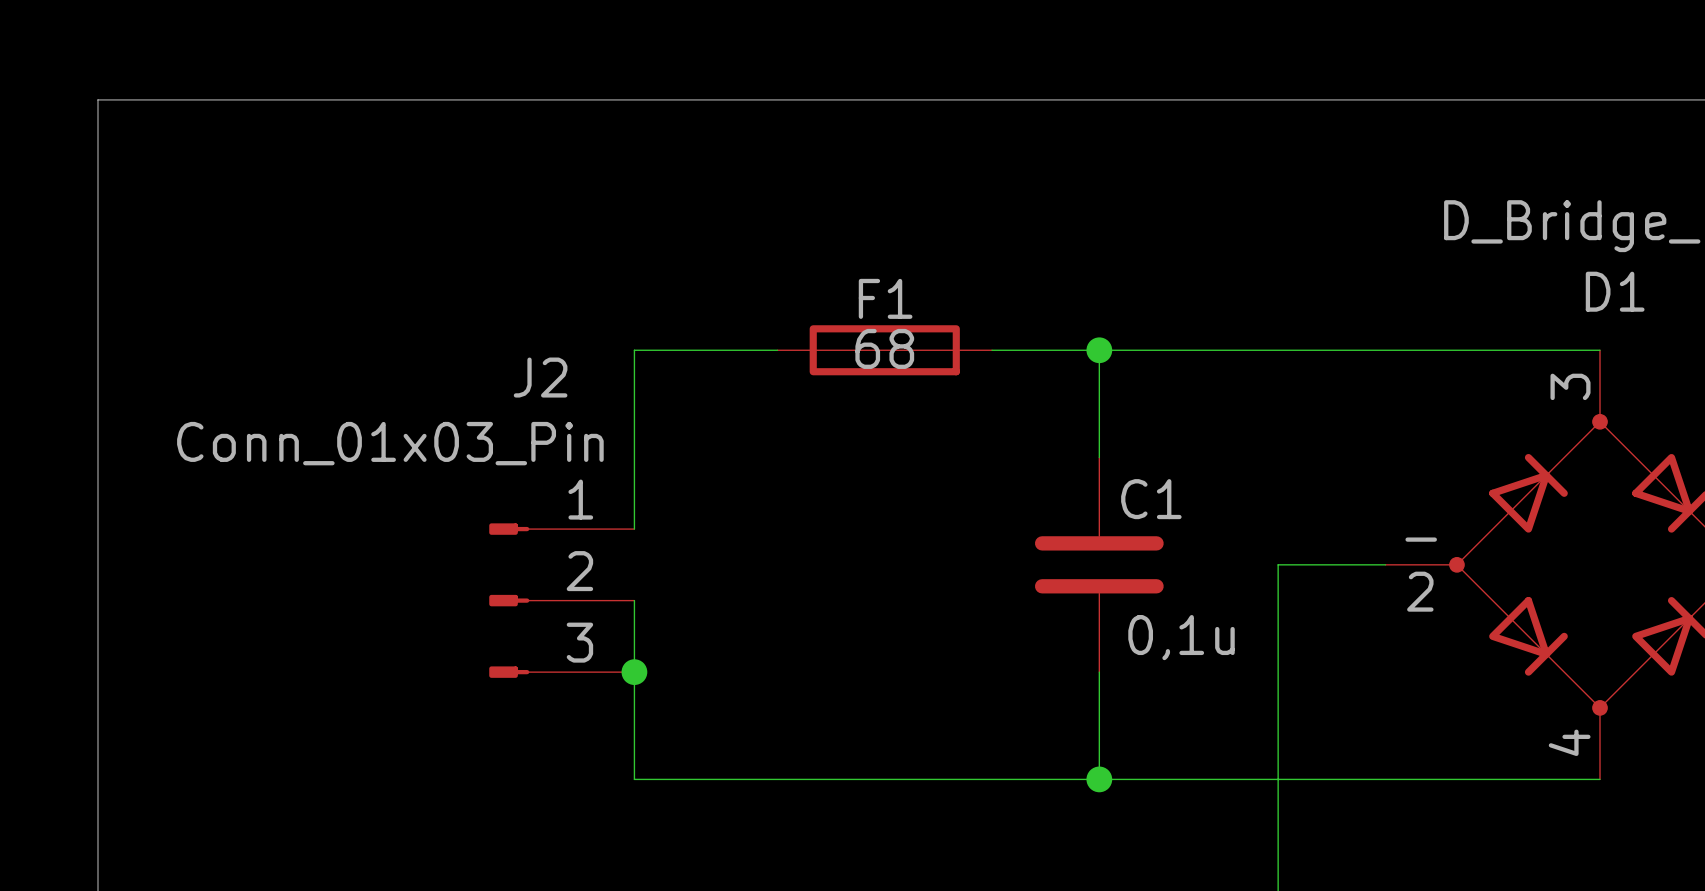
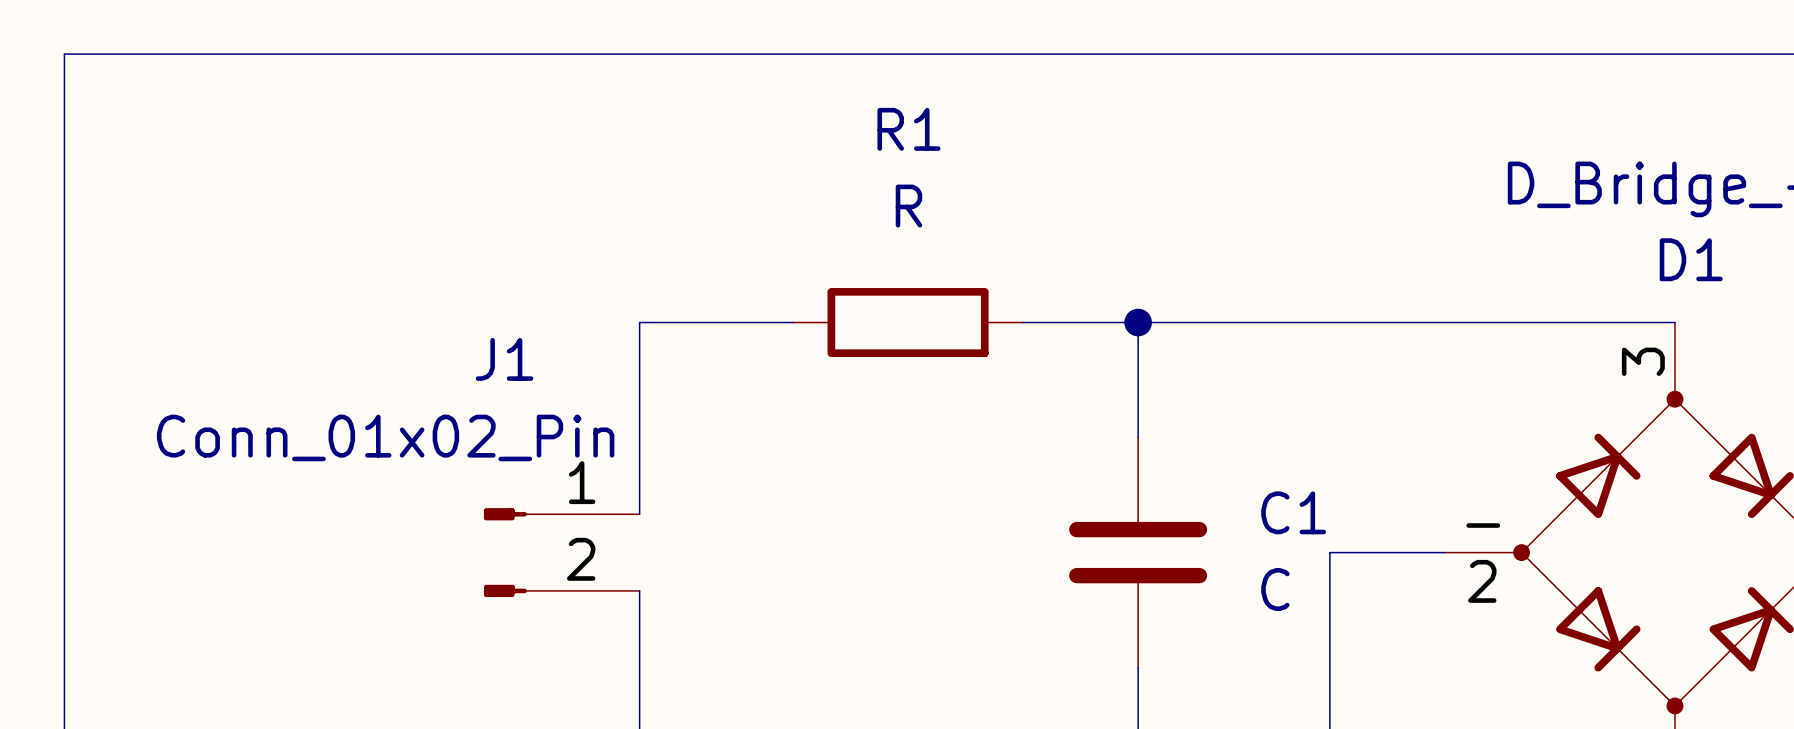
F1: 68 (884, 350) -> none
R1: none -> R (908, 322)
C1 name position: C1 (1151, 499) -> C1 (1293, 512)
J1: none -> Conn_01x02_Pin (561, 552)
J2: Conn_01x03_Pin (561, 600) -> none
C1 value: 0,1u (1181, 637) -> C (1275, 589)
junction: (634, 672) -> none

